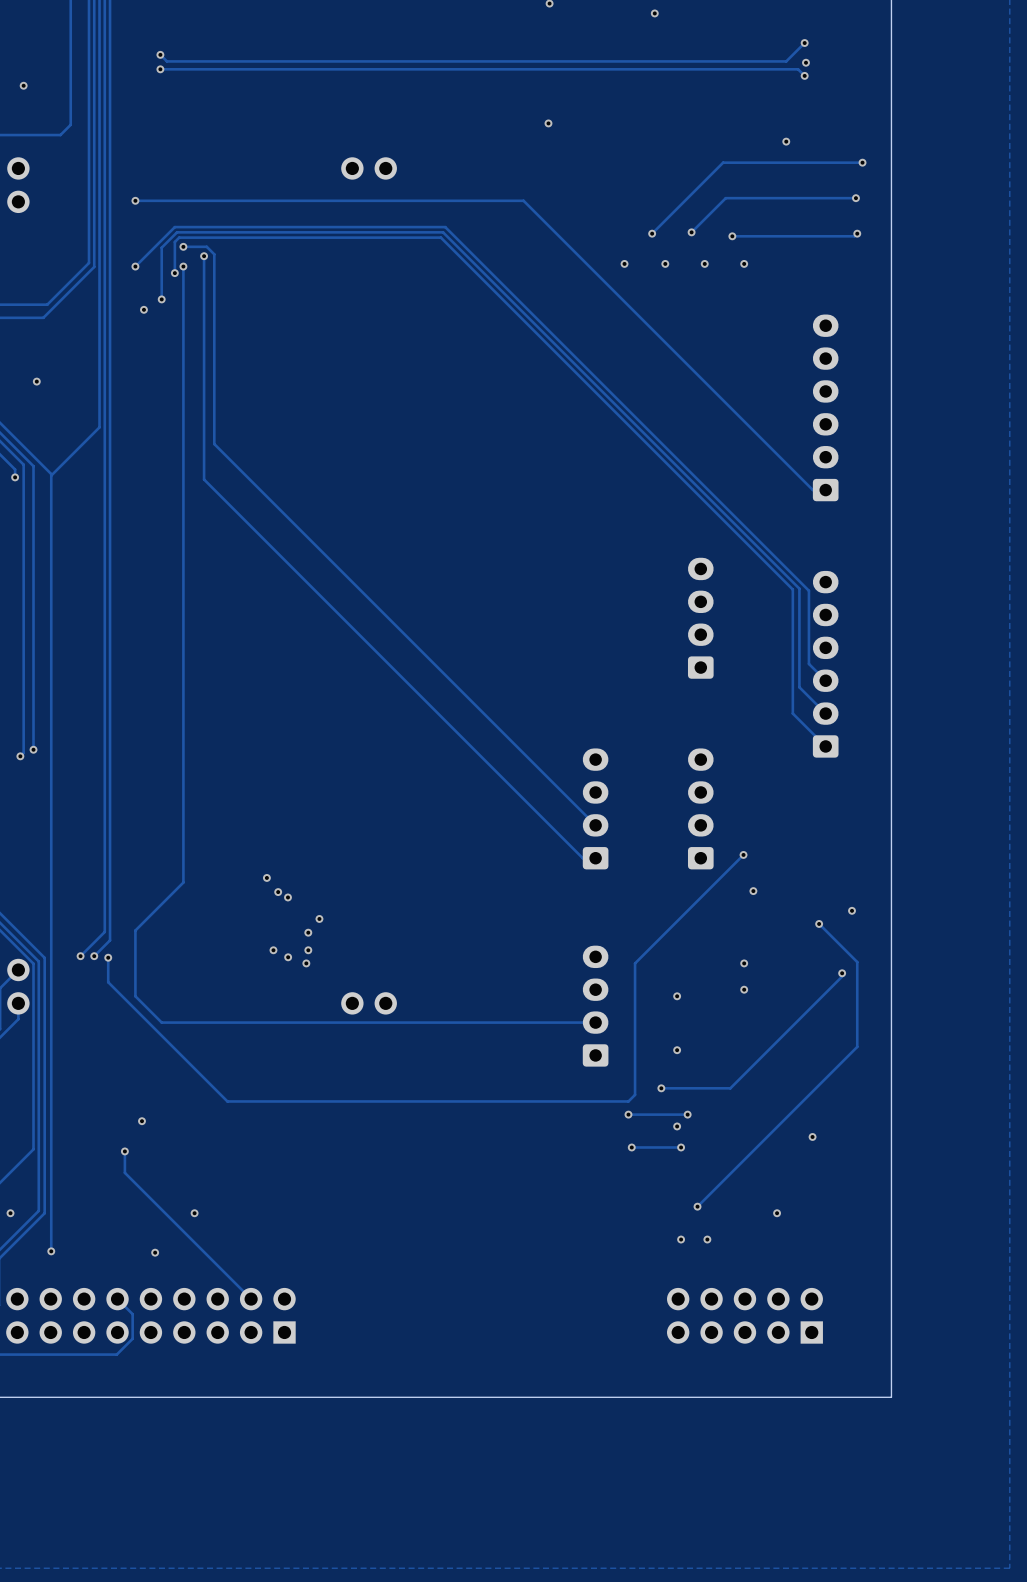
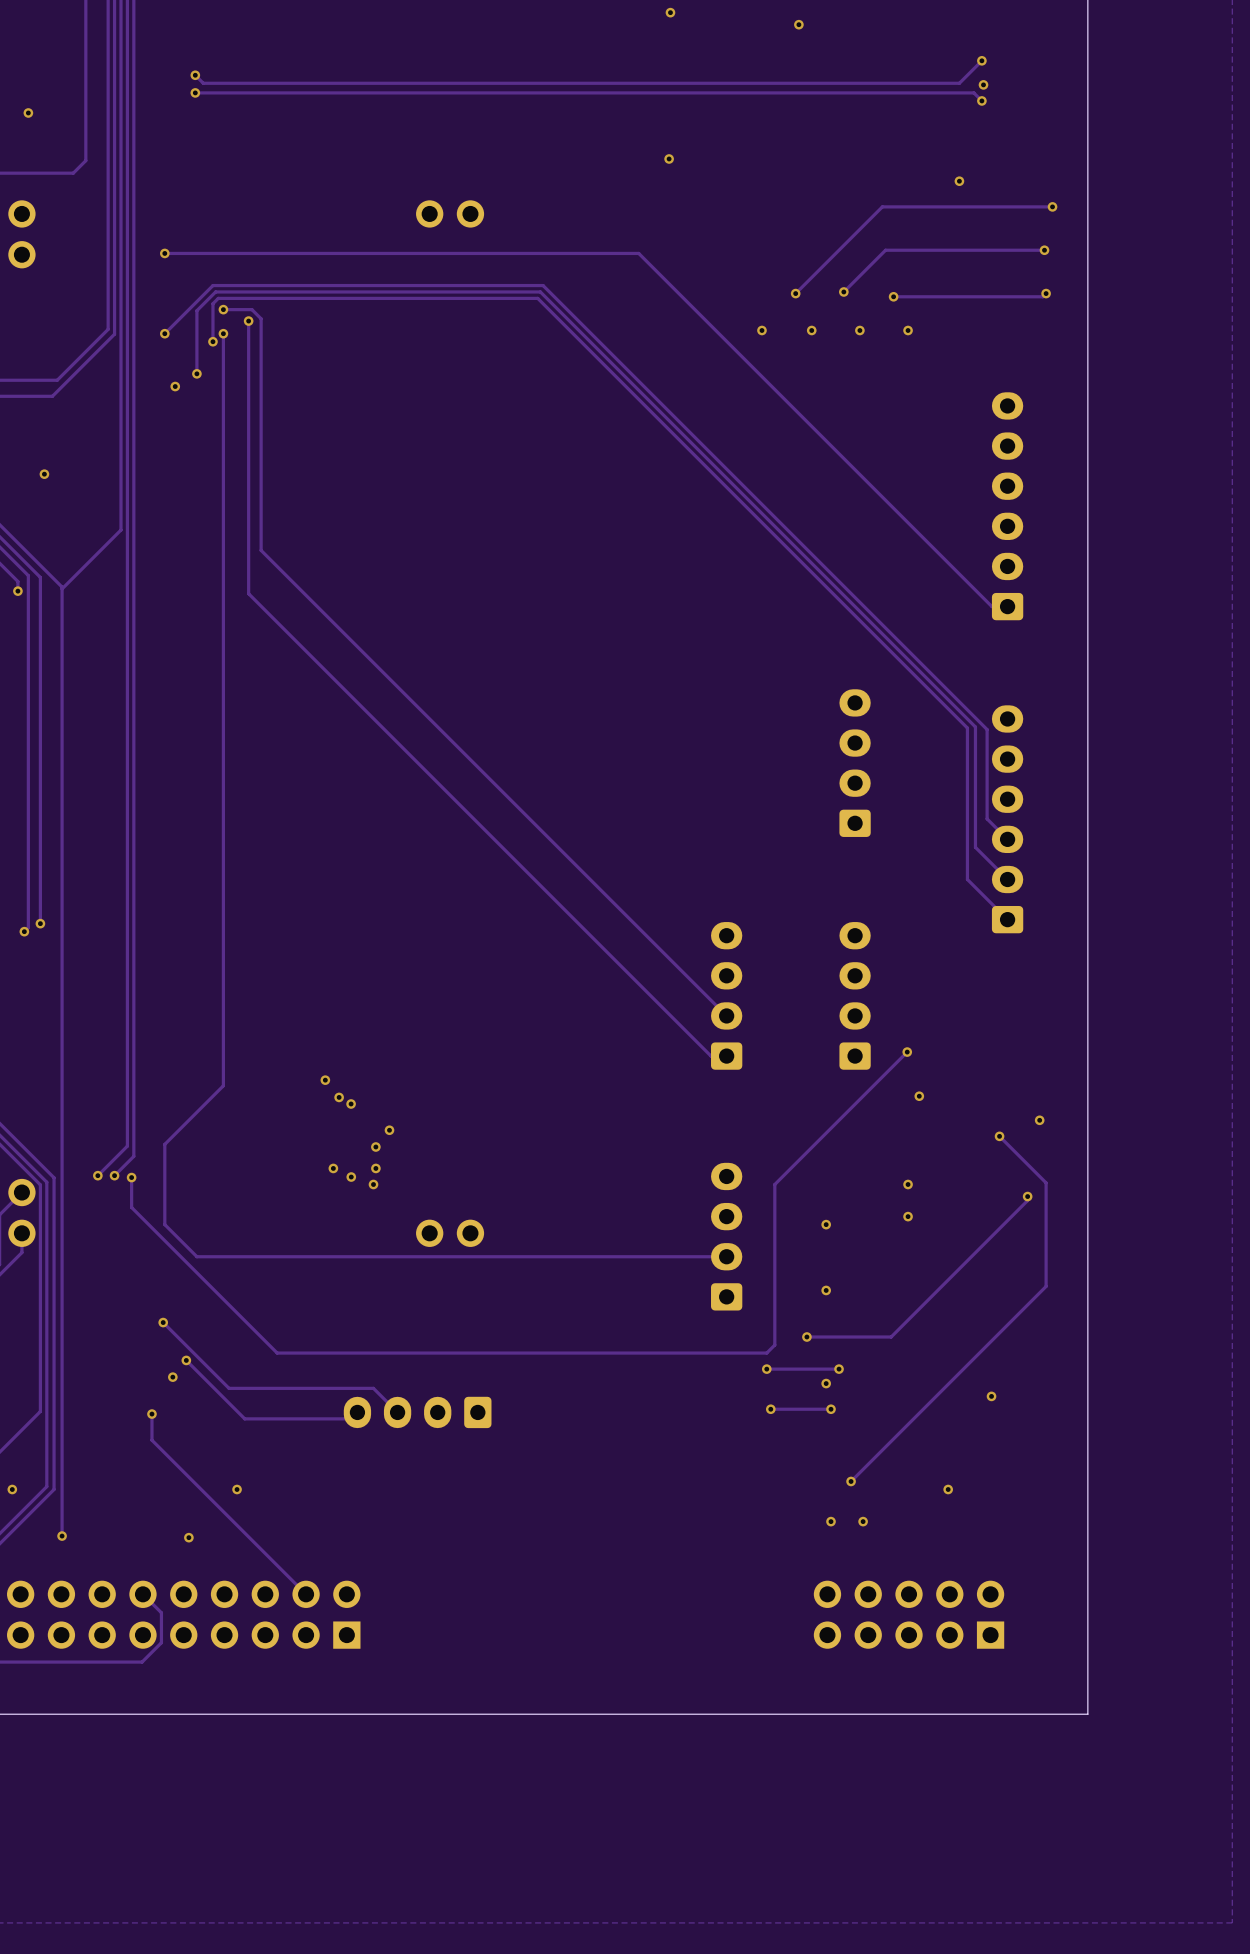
track: none -> (163, 1322) (229, 1388) (373, 1388) (397, 1412)
via: none -> (163, 1322)
track: none -> (186, 1360) (244, 1418) (351, 1418) (357, 1412)
via: none -> (186, 1360)
part: none -> (417, 1412)

